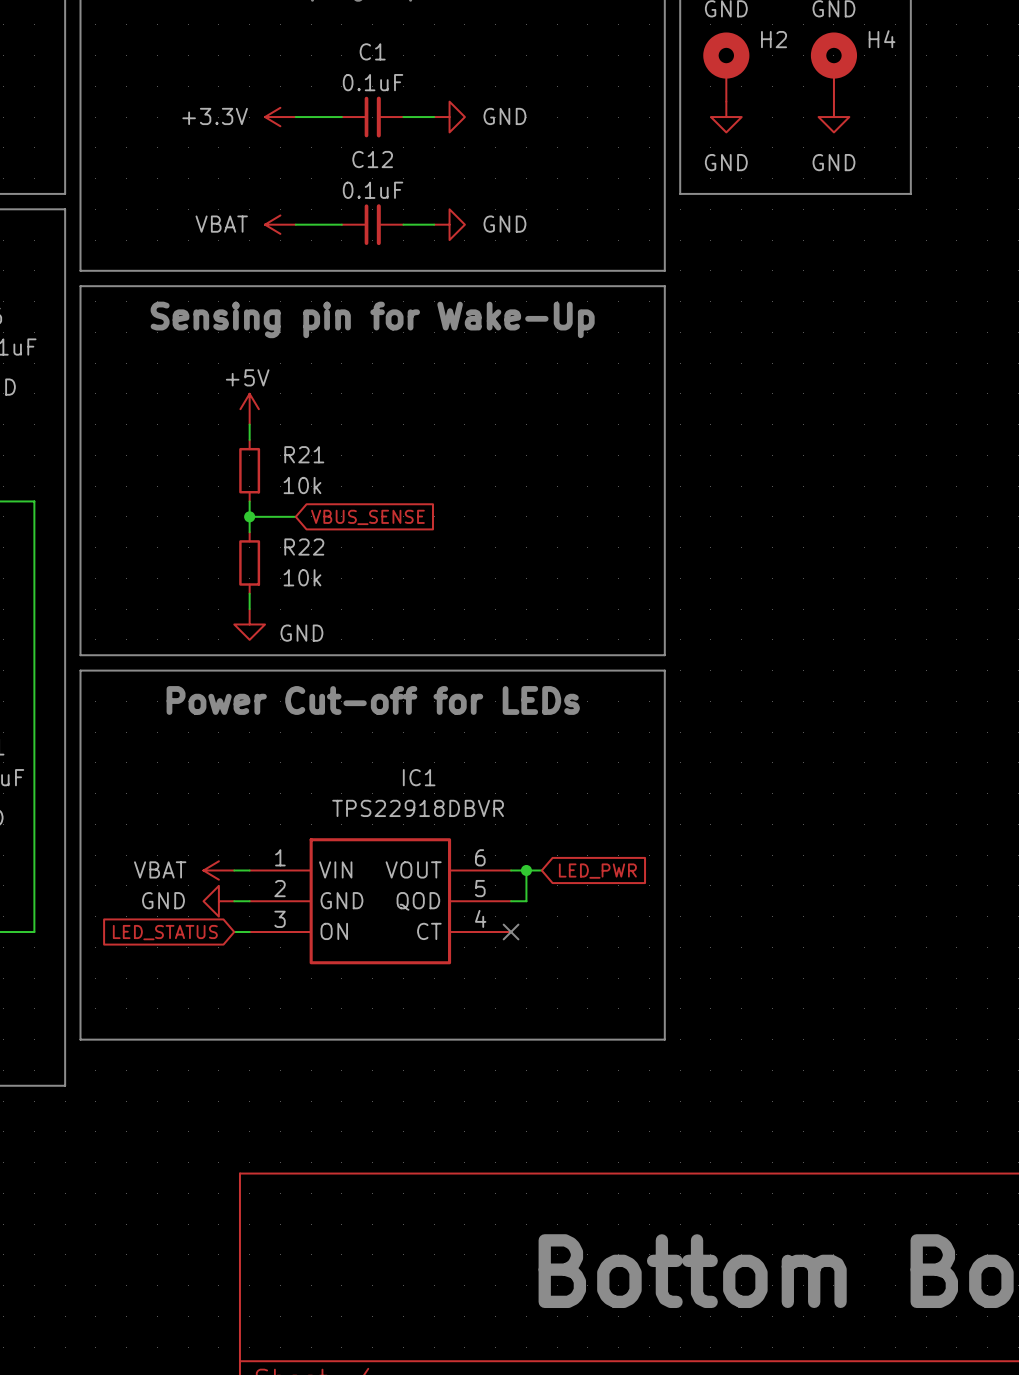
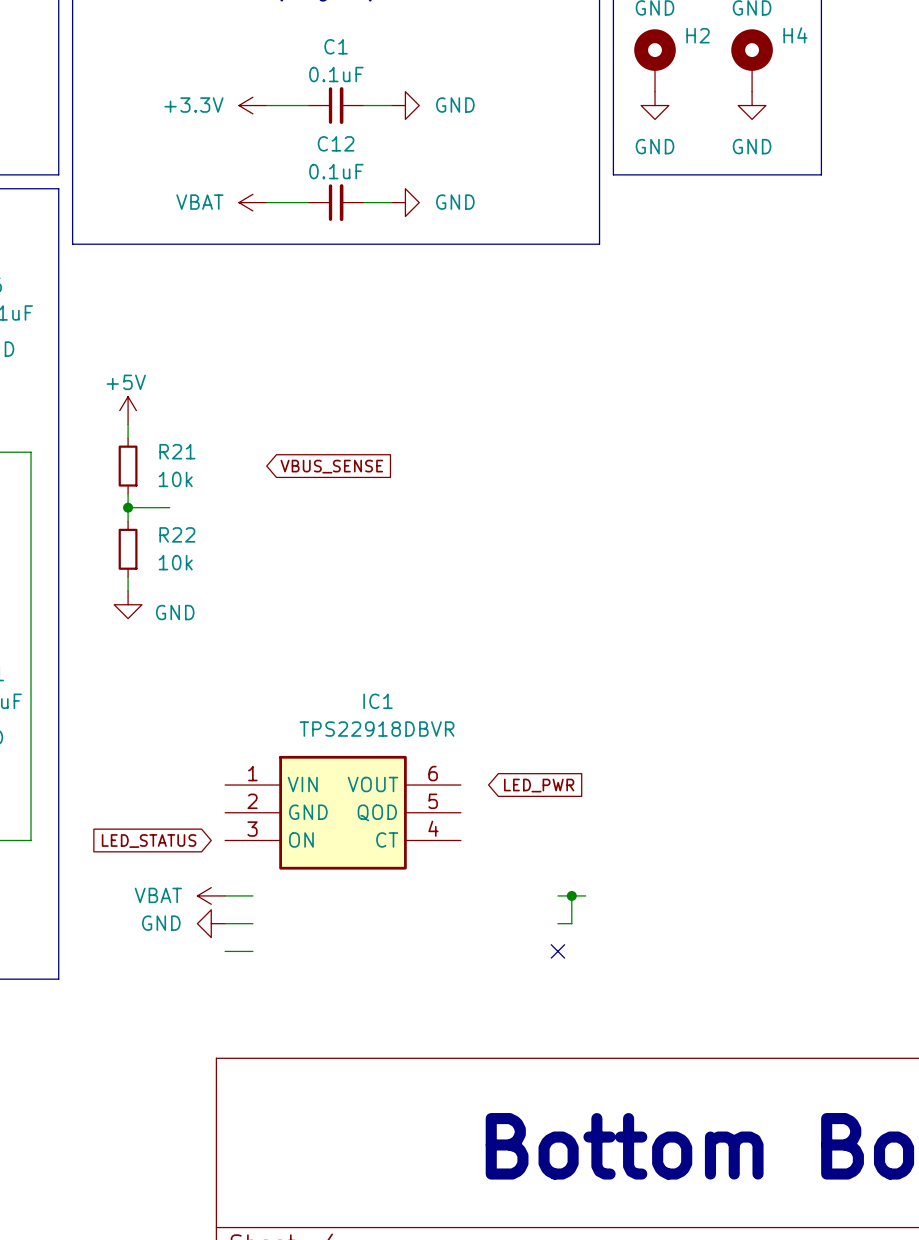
line: (80, 286) (80, 655) (664, 655) (664, 286) (80, 286) -> none
text: Sensing pin for Wake-Up (372, 319) -> none
power symbol position: +5V (249, 409) -> +5V (128, 410)
wire: (249, 424) (249, 439) -> (128, 424) (128, 438)
R21 position: (249, 470) -> (128, 466)
wire: (249, 501) (249, 532) -> (128, 493) (128, 521)
wire: (249, 516) (295, 516) -> (128, 507) (169, 507)
junction: (249, 516) -> none
junction: none -> (128, 507)
R22 position: (249, 562) -> (128, 549)
wire: (249, 593) (249, 609) -> (128, 577) (128, 590)
power symbol position: GND (249, 624) -> GND (128, 604)
line: (80, 670) (664, 670) (664, 1039) (80, 1039) (80, 670) -> none
text: Power Cut-off for LEDs (373, 700) -> none
power symbol position: VBAT (218, 870) -> VBAT (211, 895)
wire: (234, 870) (249, 870) -> none
wire: (511, 870) (541, 870) -> (557, 895) (585, 895)
wire: (526, 870) (526, 901) (511, 901) -> (571, 895) (571, 923) (557, 923)
junction: (526, 870) -> none
power symbol: GND (218, 901) -> none
wire: (234, 901) (249, 901) -> none
wire: (234, 932) (249, 932) -> none
no-connect mark: (511, 932) -> none
wire: none -> (225, 895) (252, 895)
junction: none -> (571, 895)
power symbol: none -> GND (211, 923)
wire: none -> (225, 923) (252, 923)
wire: none -> (225, 951) (252, 951)
no-connect mark: none -> (557, 951)

